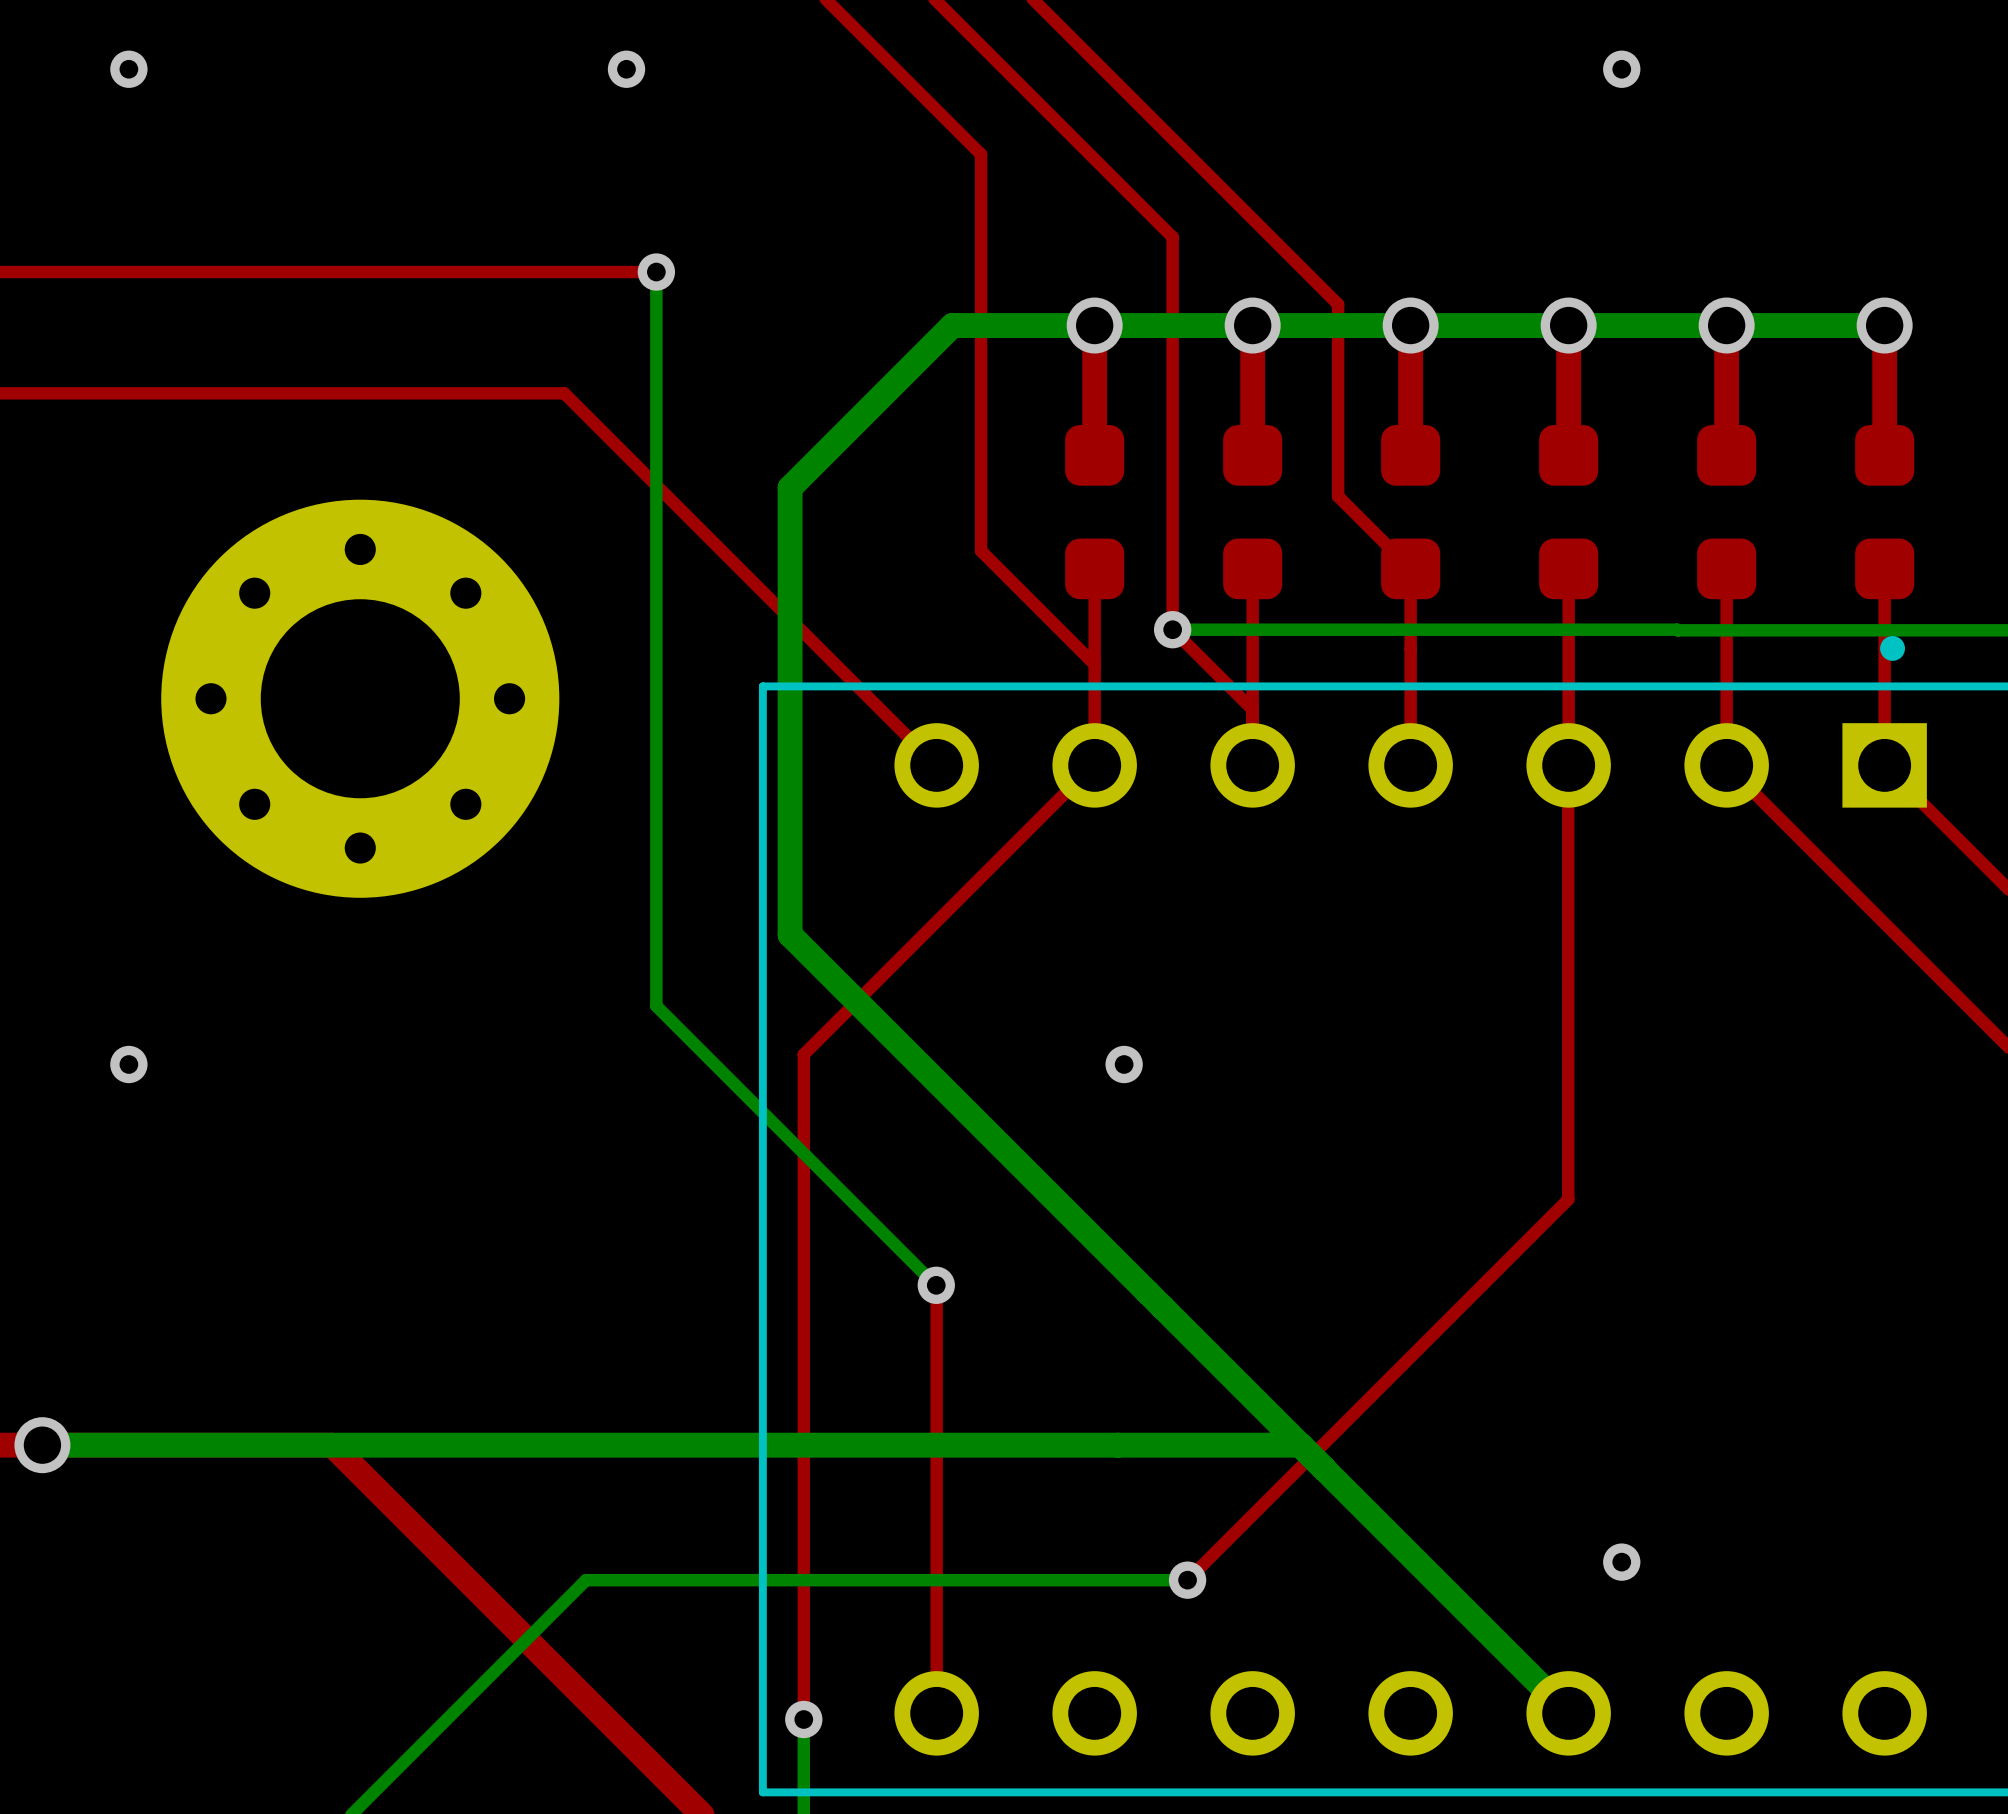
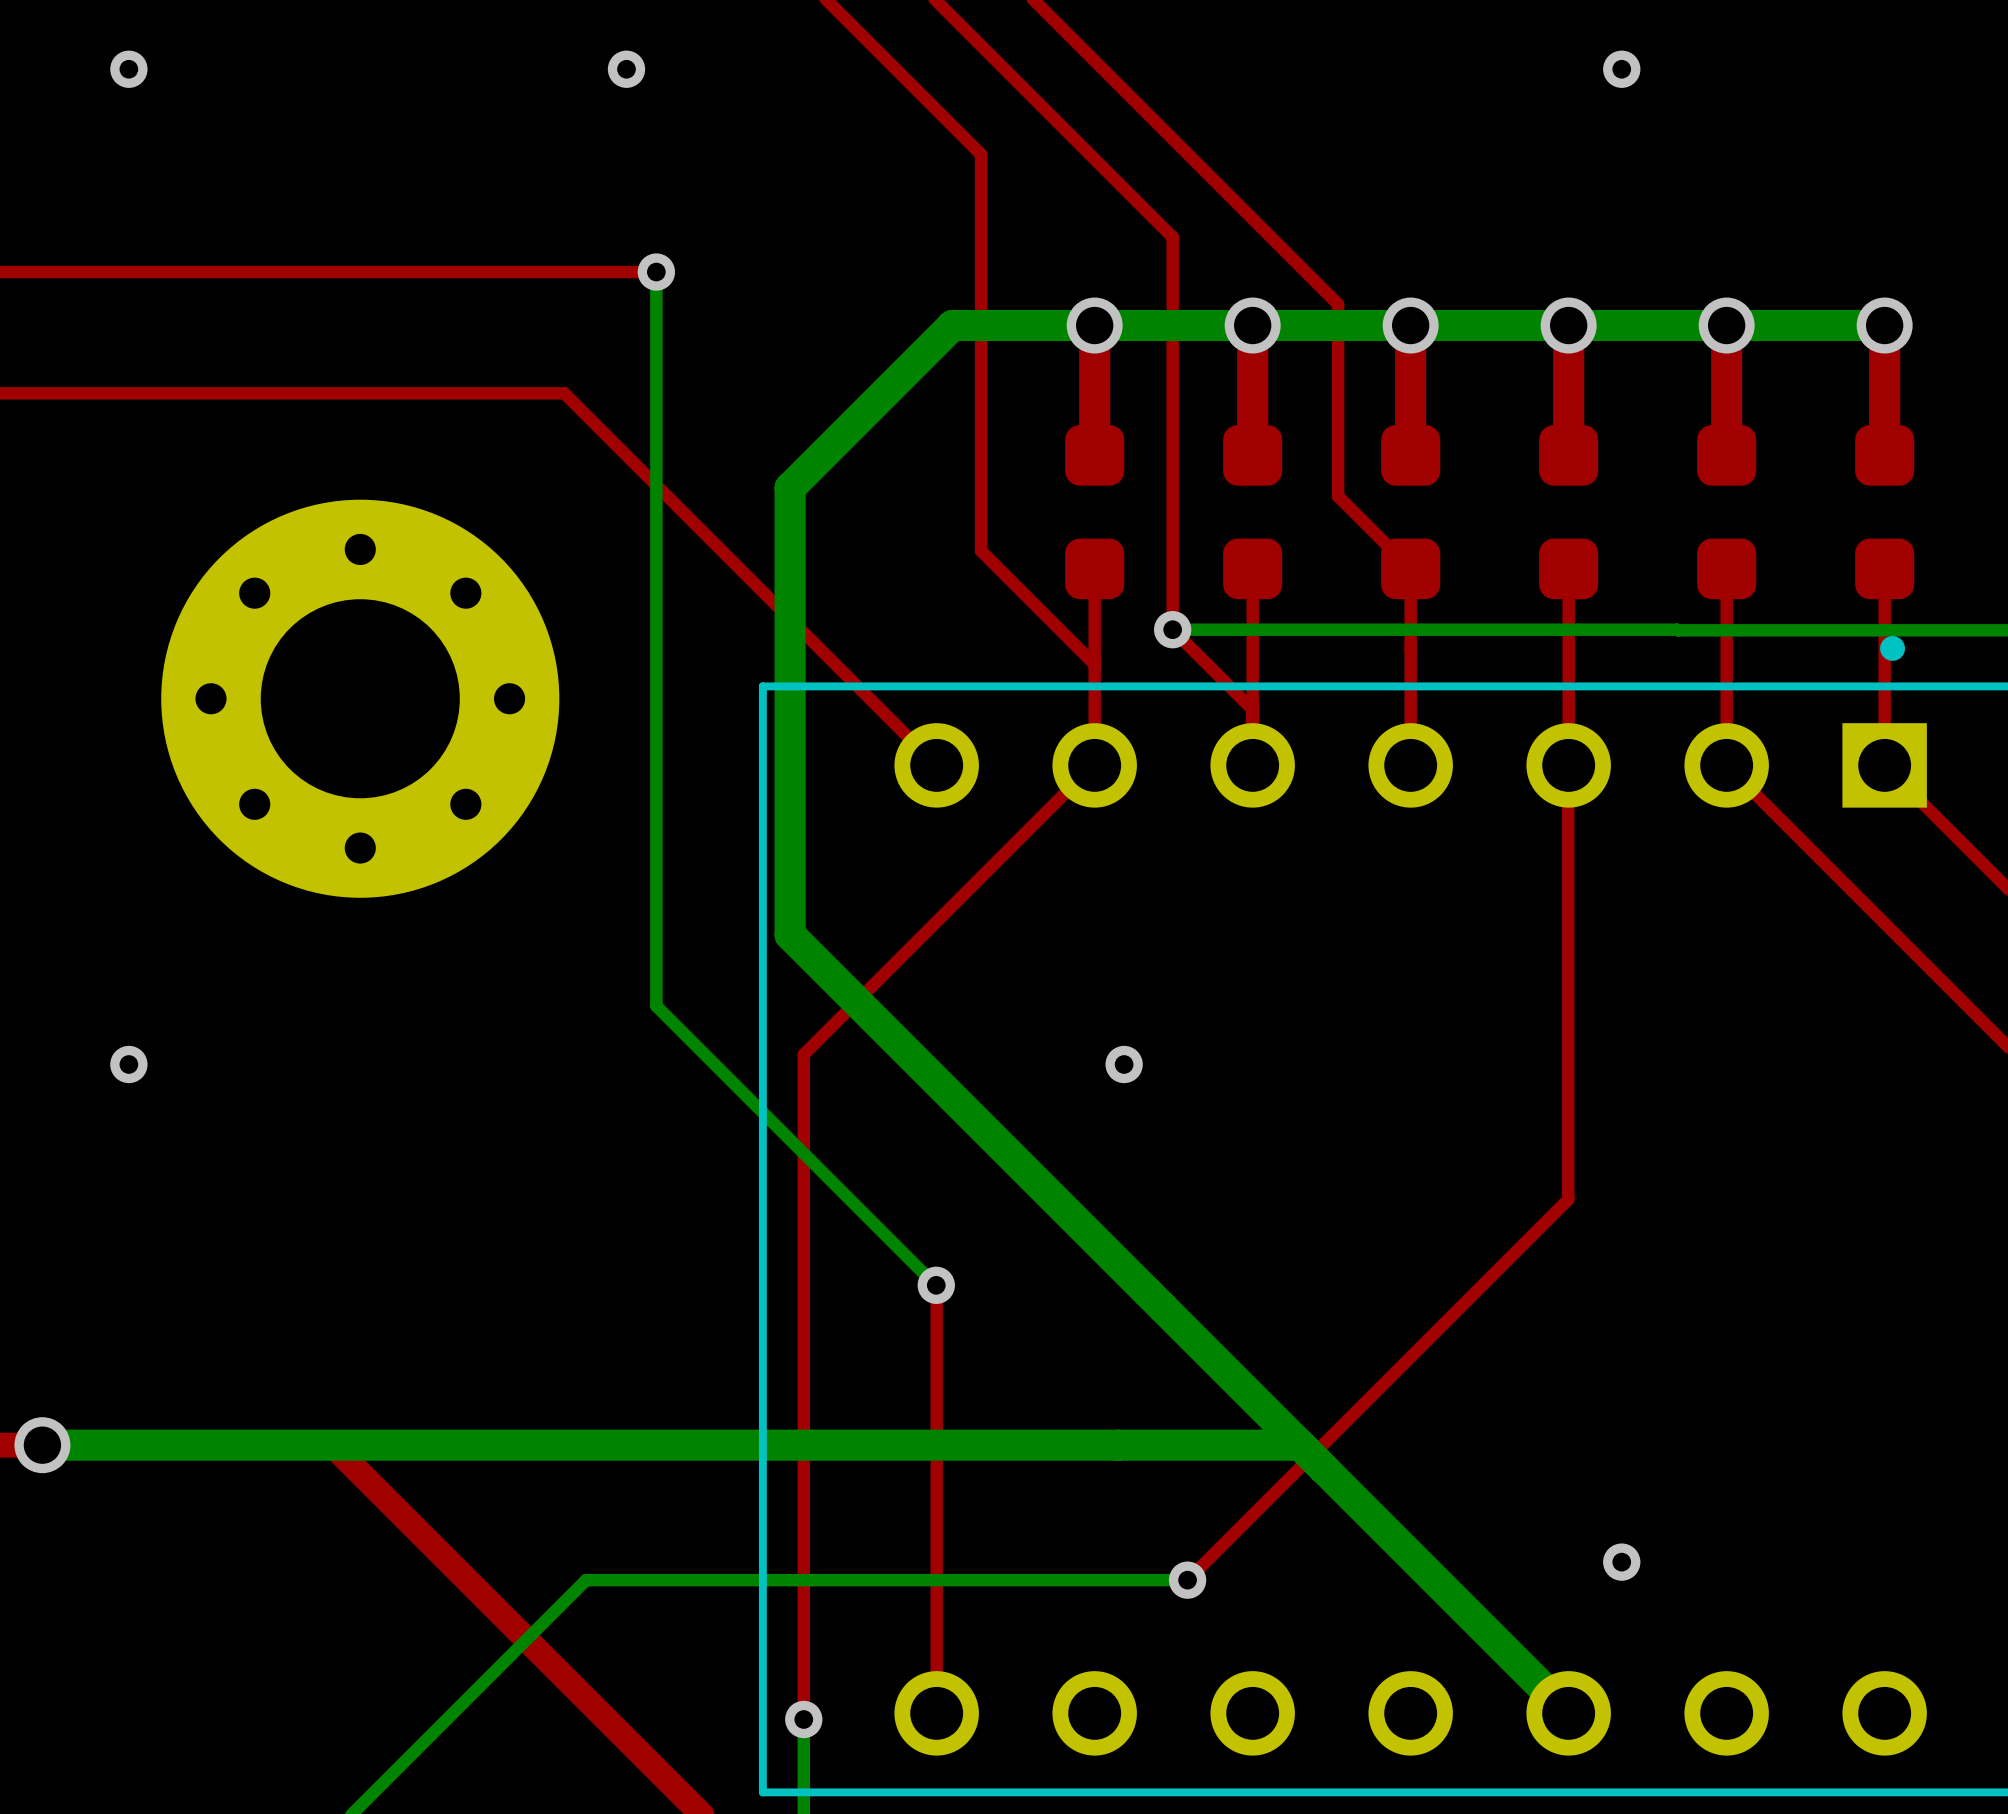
top track width: thin (1094, 325) (1094, 455) -> thick (1094, 325) (1094, 455)
top track width: thin (1252, 325) (1252, 455) -> thick (1252, 325) (1252, 455)
top track width: thin (1410, 325) (1410, 455) -> thick (1410, 325) (1410, 455)
top track width: thin (1568, 325) (1568, 455) -> thick (1568, 325) (1568, 455)
top track width: thin (1726, 325) (1726, 455) -> thick (1726, 325) (1726, 455)
top track width: thin (1884, 325) (1884, 455) -> thick (1884, 325) (1884, 455)
bottom track width: thin (1884, 325) (952, 325) (790, 487) (790, 934) (1568, 1713) -> thick (1884, 325) (952, 325) (790, 487) (790, 934) (1568, 1713)
bottom track width: thin (1300, 1445) (42, 1445) -> thick (1300, 1445) (42, 1445)

